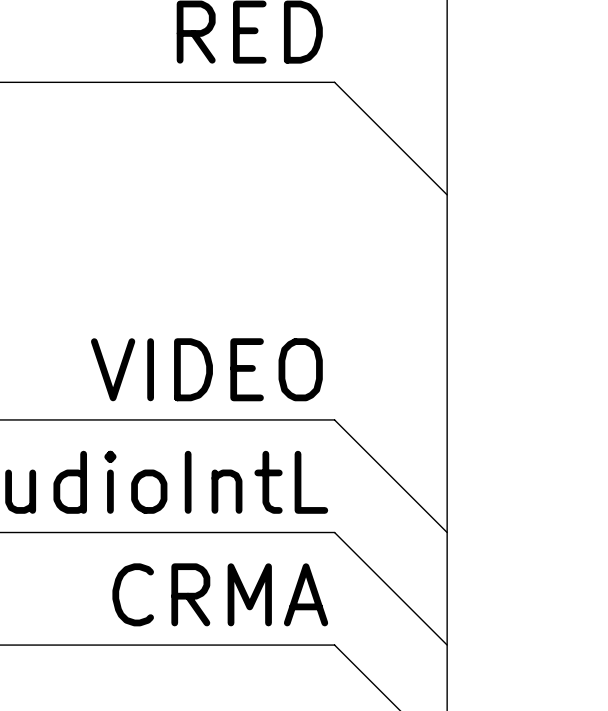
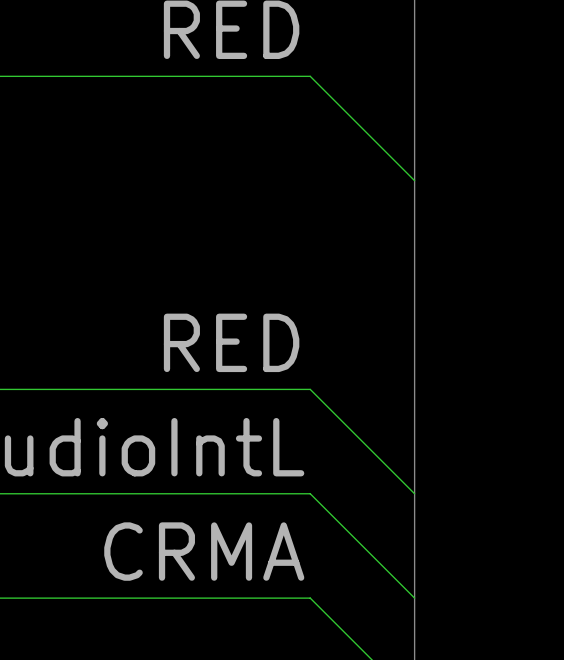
label: VIDEO (206, 369) -> RED (231, 342)

